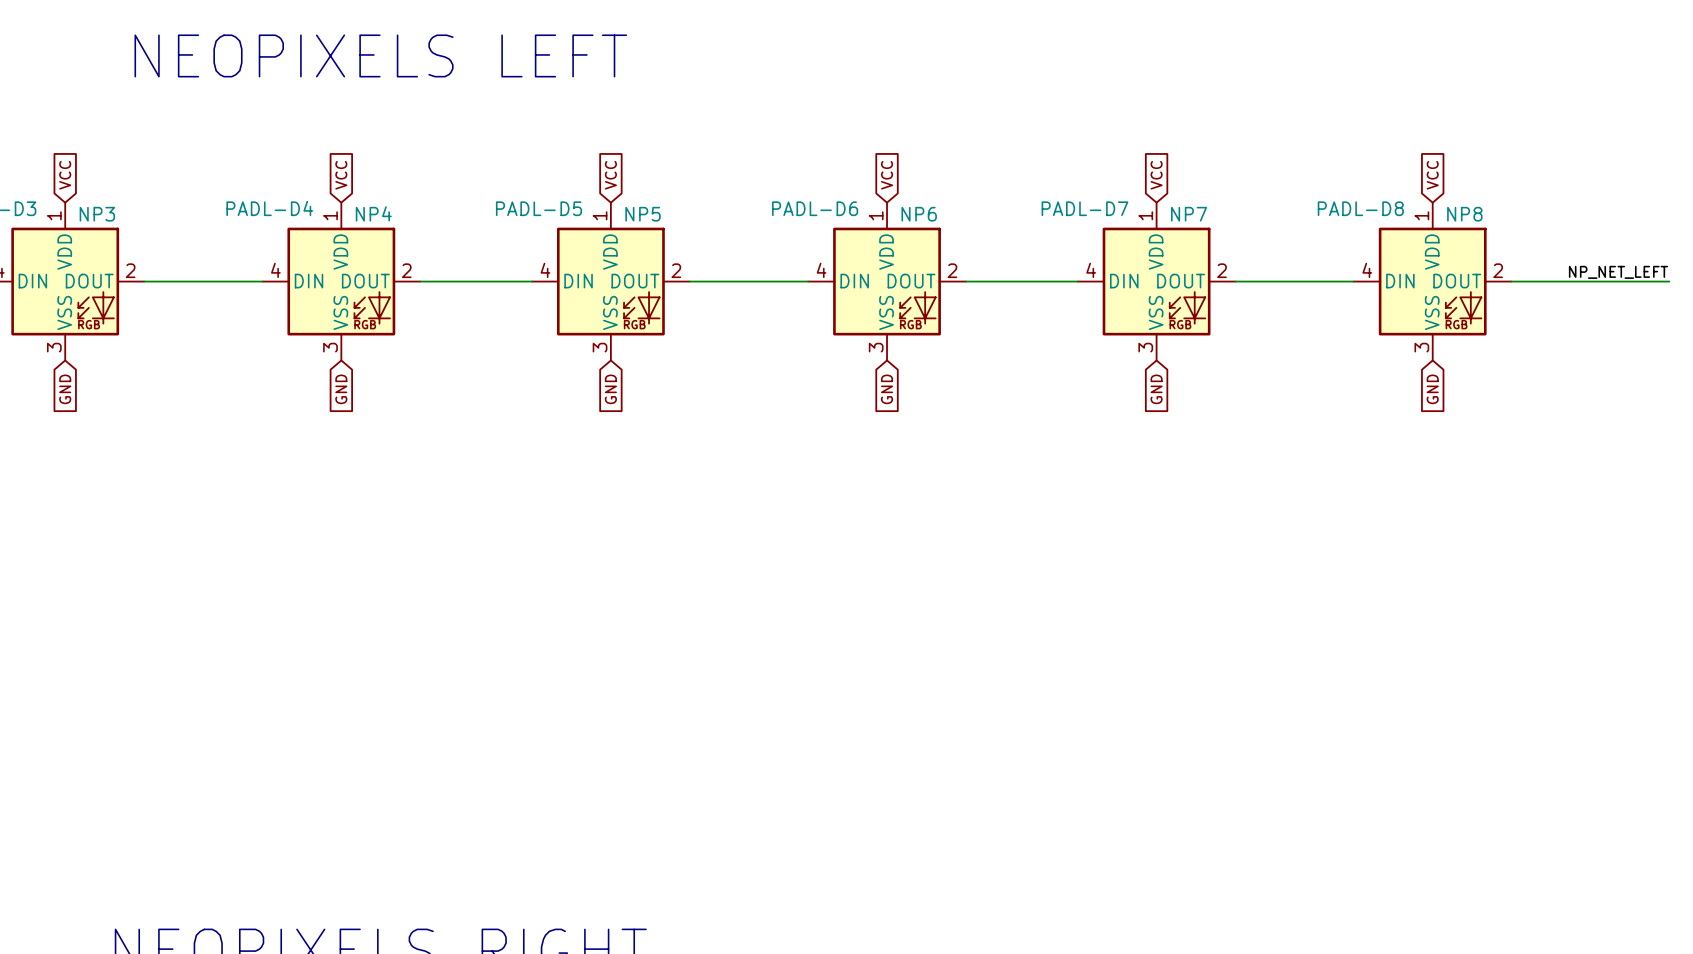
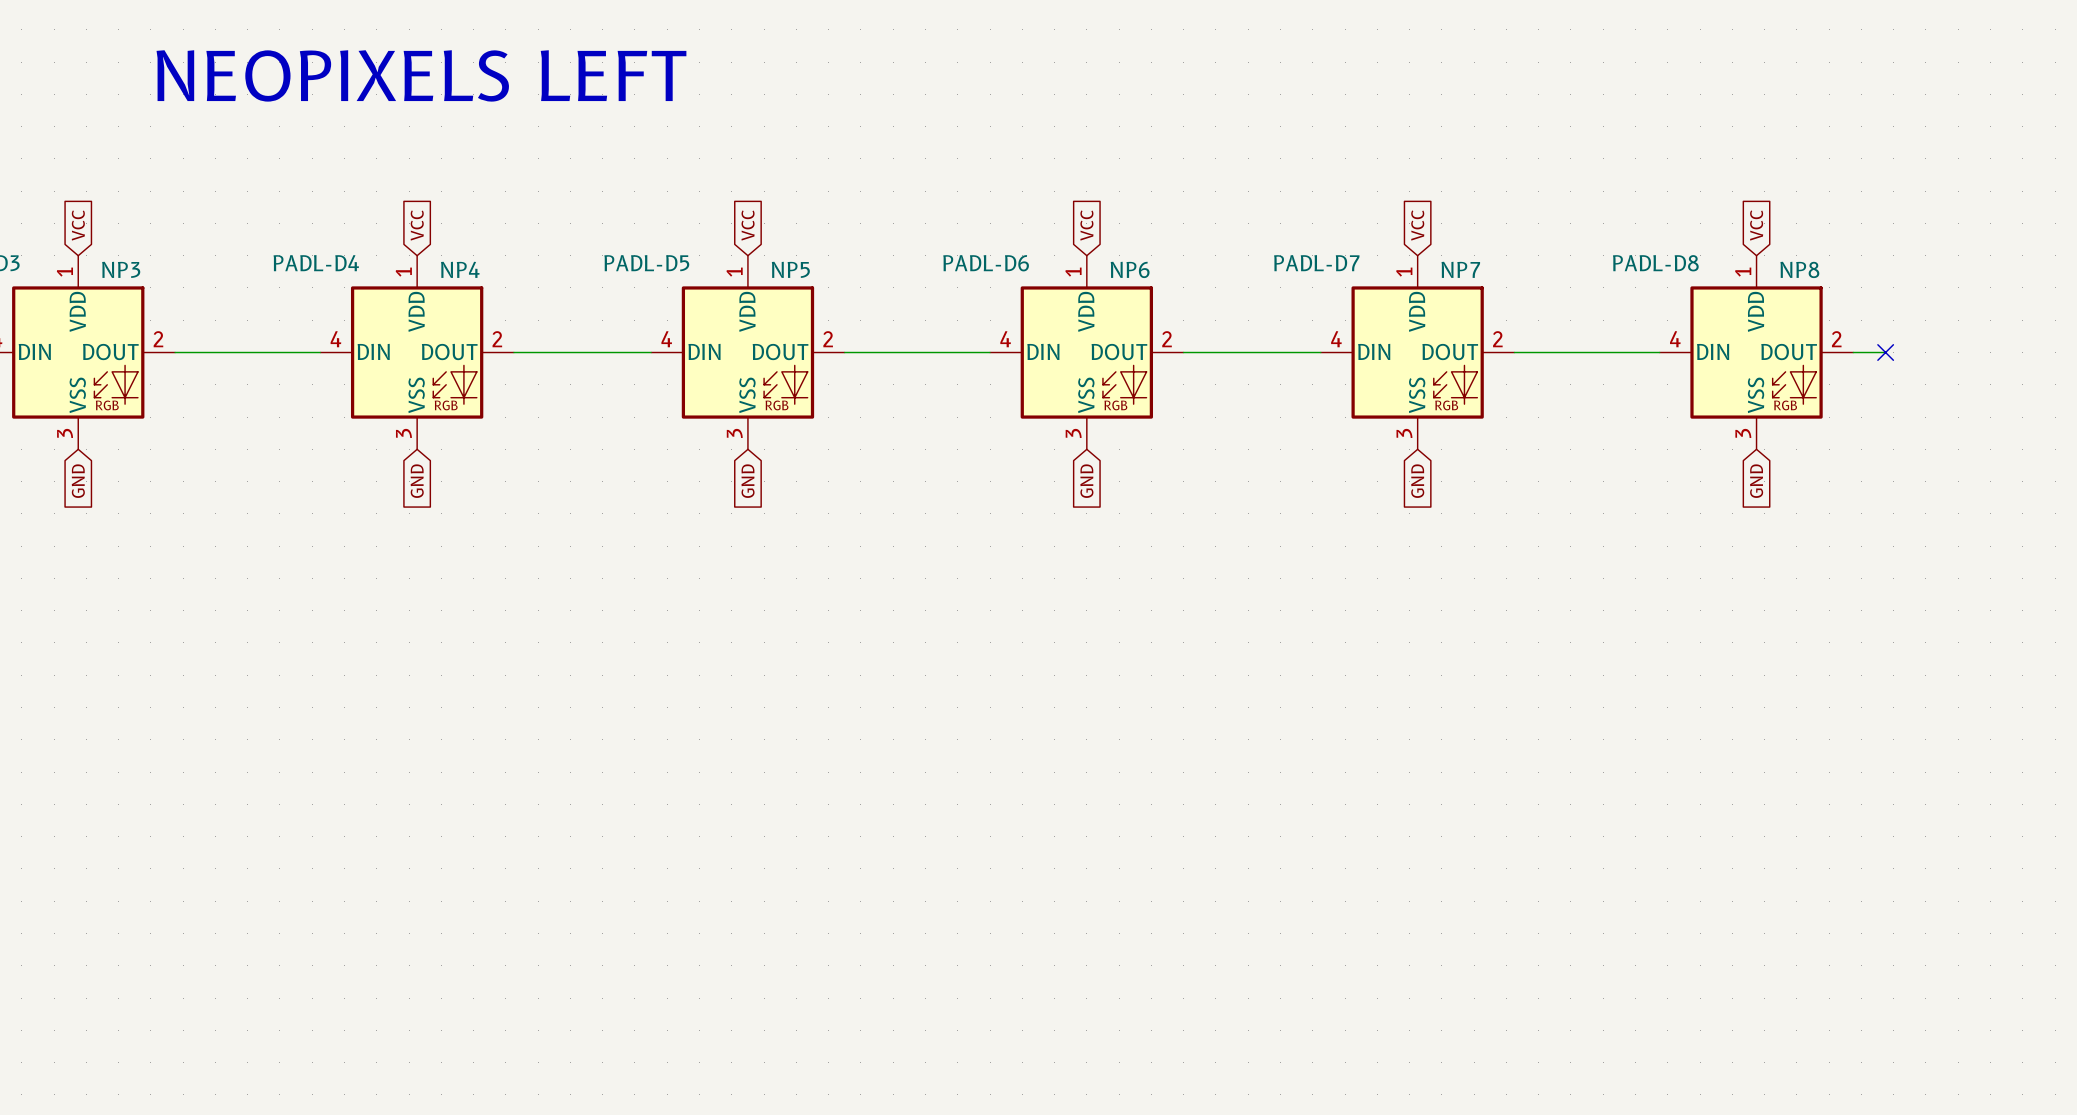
label: NP_NET_LEFT (1618, 272) -> none
wire: (1537, 281) (1669, 281) -> none
no-connect mark: none -> (1885, 352)

